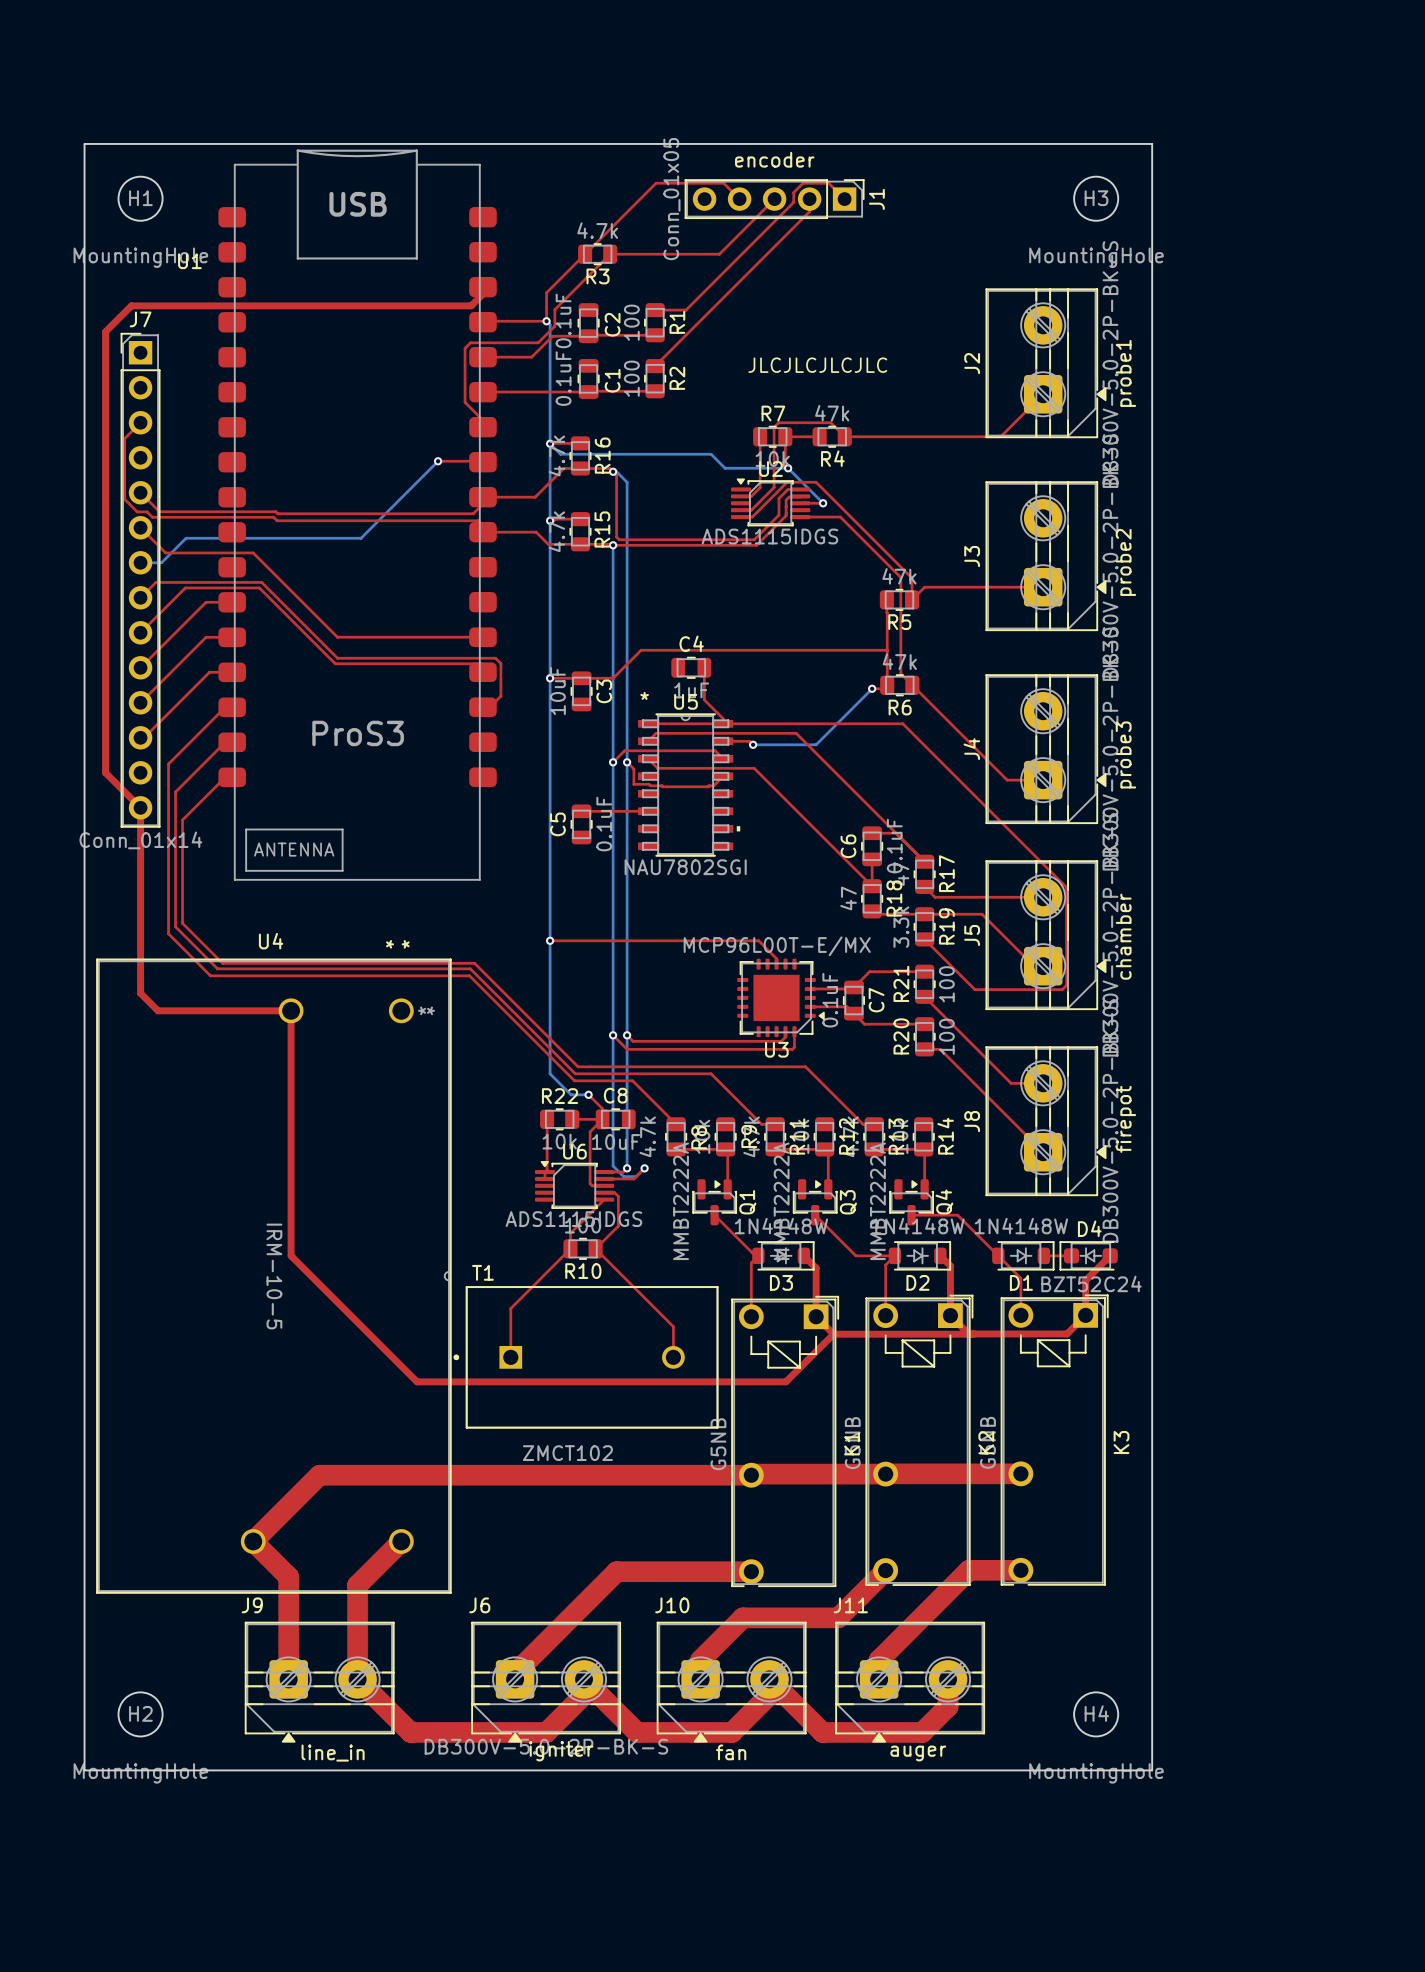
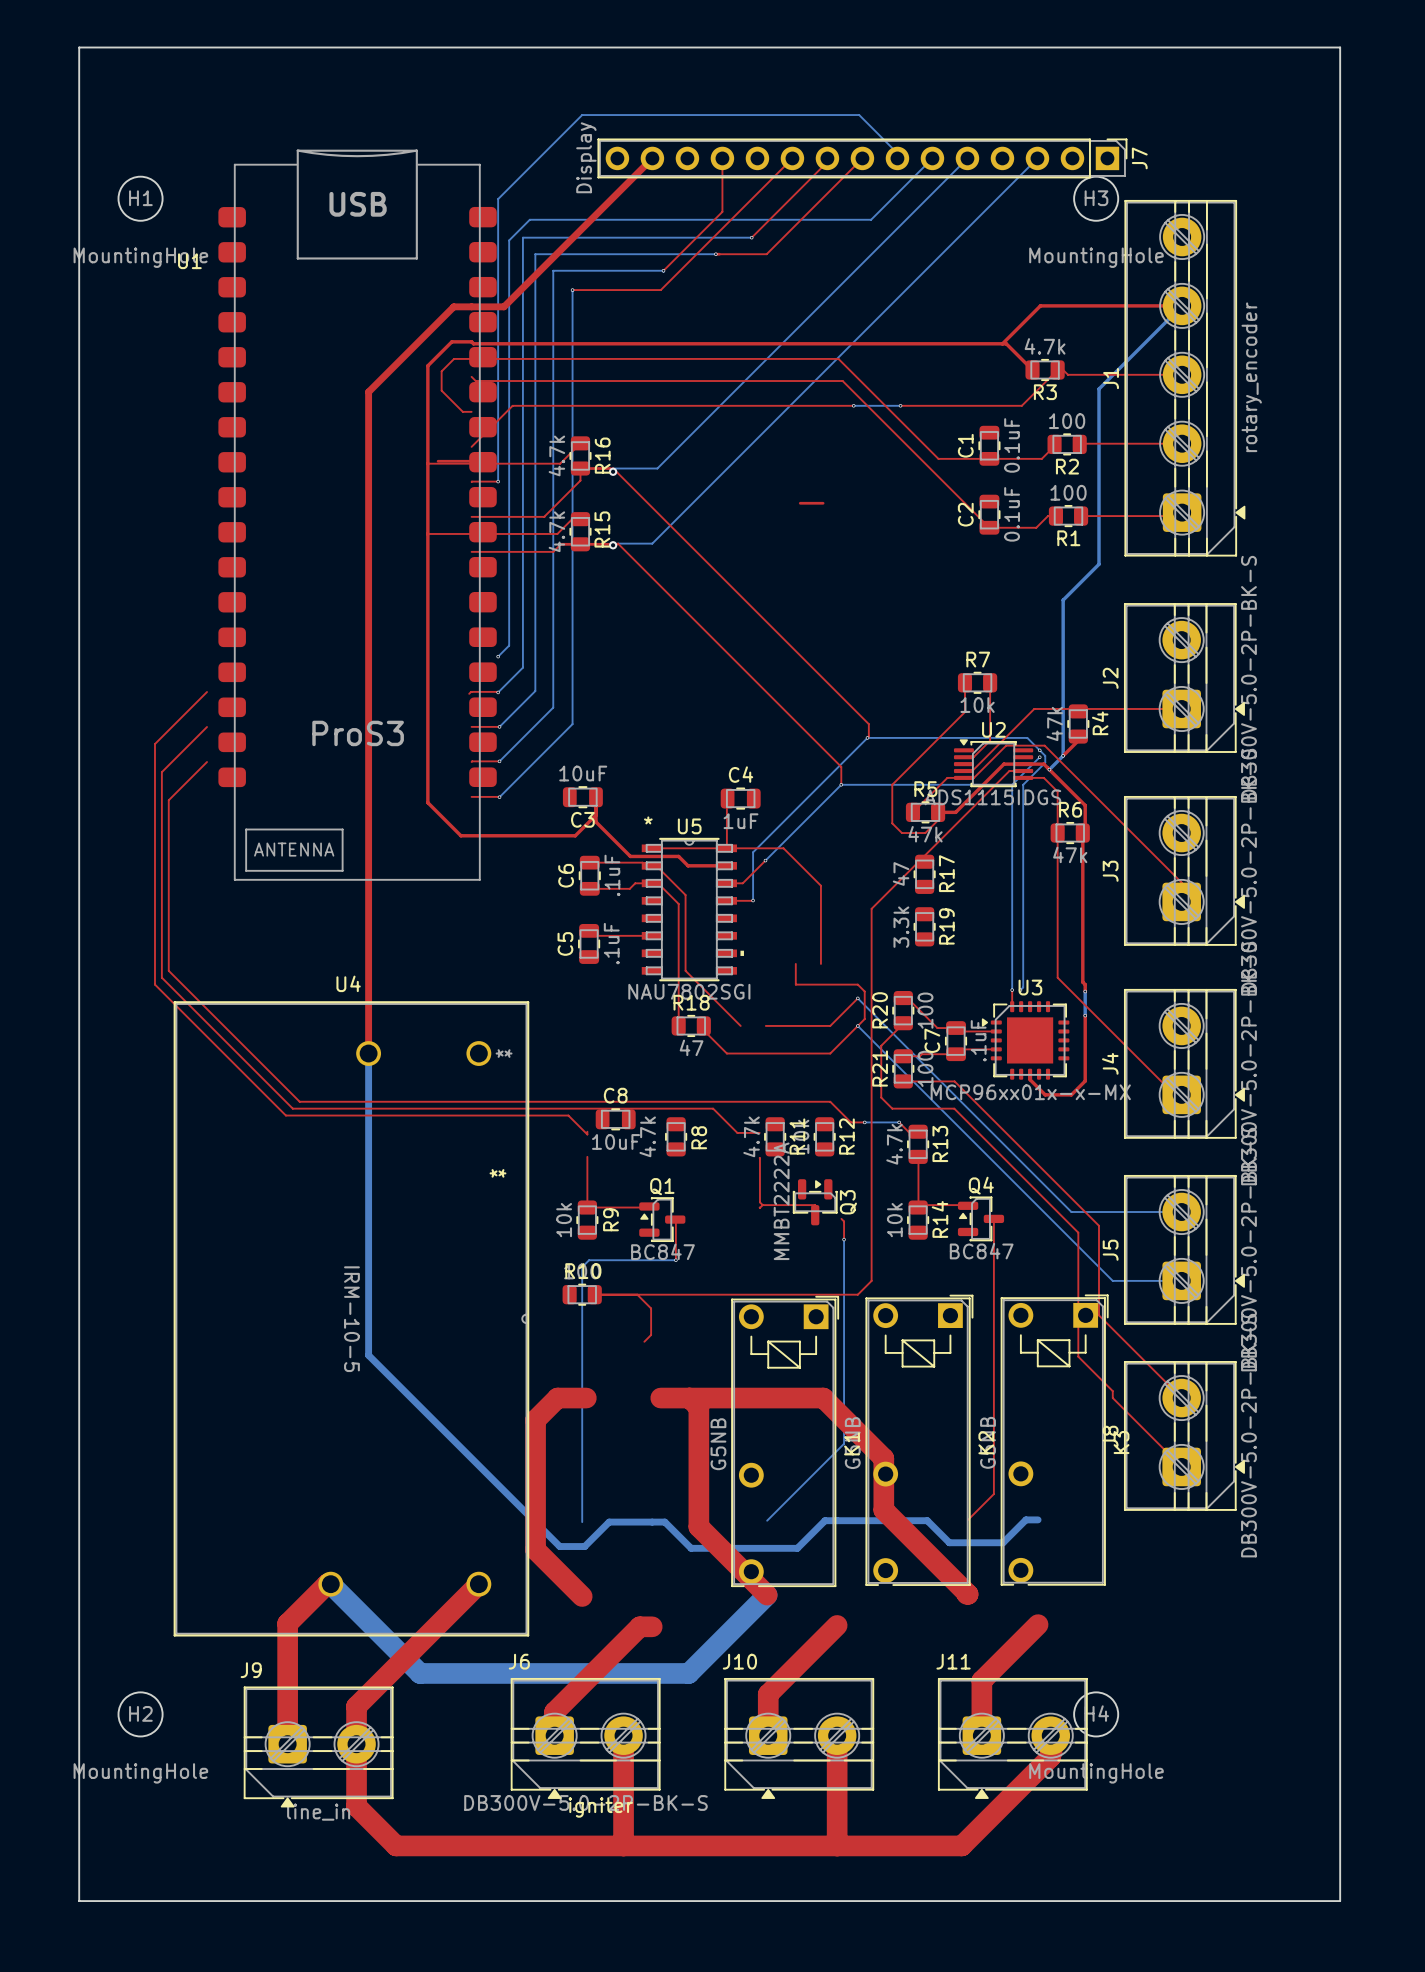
board edge: (84, 143) (1152, 143) (1152, 1770) (84, 1770) (84, 143) -> (79, 47) (79, 1901) (1340, 1901) (1340, 47) (79, 47)
top track: none -> (652, 158) (504, 306) (453, 306) (368, 392) (368, 1053)
top track: none -> (722, 158) (722, 211) (663, 270)
top track: none -> (792, 158) (660, 290) (572, 290)
top track: none -> (827, 158) (827, 161) (751, 237)
bottom track: none -> (897, 158) (897, 153) (859, 115) (582, 115) (498, 199) (498, 481)
bottom track: none -> (932, 158) (871, 219) (529, 219) (509, 240) (509, 645) (498, 656)
bottom track: none -> (967, 158) (657, 468) (613, 468)
bottom track: none -> (1037, 158) (652, 543) (618, 543)
J1 text: encoder (774, 159) -> none
J1 footprint: [684, 179, 865, 219] -> [1124, 200, 1246, 557]
J1 value: Conn_01x05 (671, 199) -> rotary_encoder (1251, 377)
top track: (739, 199) (723, 183) (656, 183) (546, 292) (546, 321) (489, 322) -> none
top track: (774, 199) (719, 254) -> (861, 160) (862, 158) (766, 254) (719, 254)
top track: (809, 199) (809, 211) (655, 366) -> none
top track: (844, 199) (828, 183) (803, 183) (793, 192) (793, 202) (686, 310) (655, 310) -> none
J1 name position: J1 (876, 199) -> J1 (1111, 378)
bottom track: none -> (751, 237) (522, 237) (522, 667) (498, 692)
via: none -> (751, 237)
R3 position: (597, 254) -> (1045, 369)
top track: (715, 254) (610, 254) (554, 309) (554, 326) (538, 342) (470, 342) (465, 348) (465, 402) (489, 427) -> none
bottom track: none -> (715, 254) (535, 254) (535, 691) (499, 726)
via: none -> (715, 254)
via: none -> (663, 270)
bottom track: none -> (663, 272) (553, 270) (553, 707) (499, 761)
top track: (489, 287) (471, 305) (131, 305) (105, 331) (105, 772) (140, 807) (140, 993) (158, 1010) (291, 1010) (291, 1255) (417, 1381) (785, 1381) (833, 1334) -> none
via: none -> (572, 290)
bottom track: none -> (573, 290) (572, 724) (499, 797)
top track: none -> (1182, 305) (1040, 305) (1002, 343)
bottom track: none -> (1182, 305) (1099, 389) (1099, 564) (1063, 600) (1063, 755) (1049, 769)
J7 name position: J7 (140, 319) -> J7 (1139, 158)
C2 value position: 0.1uF (563, 320) -> 0.1uF (1012, 514)
bottom track: (546, 321) (550, 324) (550, 1073) (571, 1094) (588, 1094) -> none
via: (546, 321) -> none
R1 rotation: 0° (655, 322) -> 90° clockwise (1068, 516)
R1 position: (655, 322) -> (1068, 516)
C2 position: (588, 323) -> (989, 514)
C2 name position: C2 (612, 324) -> C2 (965, 514)
J7 footprint: [120, 332, 161, 828] -> [597, 138, 1128, 179]
top track: (655, 335) (552, 336) (531, 357) (489, 357) -> none
J2 position: (1046, 363) -> (1184, 677)
text: JLCJLCJLCJLC (817, 365) -> none
top track: none -> (1032, 369) (1006, 343) (473, 343) (471, 341) (451, 341) (427, 365) (427, 802) (460, 835) (575, 835) (595, 815)
J2 text: probe1 (1125, 373) -> none
top track: none -> (1182, 374) (1067, 374) (1063, 369) (1057, 369) (1021, 405) (900, 405)
top track: none -> (471, 376) (475, 381) (842, 381) (989, 527) (1036, 527) (1048, 516) (1055, 516)
C1 value position: 0.1uF (563, 378) -> 0.1uF (1012, 445)
C1 position: (588, 378) -> (989, 445)
R2 rotation: 0° (655, 378) -> 90° clockwise (1067, 444)
R2 position: (655, 378) -> (1067, 444)
C1 name position: C1 (612, 380) -> C1 (965, 445)
top track: (655, 391) (490, 392) -> none
top track: (1043, 394) (1000, 436) (844, 436) (830, 422) (778, 422) (774, 427) (774, 447) -> none
top track: none -> (853, 405) (512, 405) (471, 446)
bottom track: none -> (853, 405) (900, 405)
via: none -> (853, 405)
via: none -> (900, 405)
top track: none -> (471, 411) (462, 411) (441, 390) (441, 371) (454, 358) (838, 358) (938, 458) (1041, 458) (1054, 444)
R4 value position: 47k (832, 413) -> 47k (1054, 723)
top track: (140, 422) (124, 438) (124, 499) (137, 511) (147, 511) (152, 517) (273, 517) (277, 520) (478, 520) (489, 532) (536, 532) (548, 544) (560, 544) -> (471, 551) (553, 551) (560, 544)
top track: (760, 436) (760, 487) (751, 496) (740, 496) -> none
R7 position: (772, 436) -> (977, 682)
top track: (819, 436) (785, 436) (785, 465) (788, 468) -> none
R4 rotation: 0° (832, 436) -> 90° clockwise (1078, 723)
R4 position: (832, 436) -> (1078, 723)
bottom track: (550, 443) (560, 454) (711, 454) (725, 468) (788, 468) (823, 503) -> none
via: (550, 443) -> none
top track: (580, 443) (550, 443) -> (580, 443) (560, 463) (427, 463)
top track: none -> (1079, 443) (1182, 443)
top track: (774, 447) (774, 487) (751, 510) (740, 510) -> none
R4 name position: R4 (832, 458) -> R4 (1100, 723)
bottom track: (438, 461) (361, 538) (186, 538) (161, 562) (140, 562) -> none
via: (438, 461) -> none
top track: (580, 468) (563, 468) (535, 497) (489, 497) (473, 513) (159, 511) (140, 492) -> (580, 468) (580, 480) (544, 516)
top track: (609, 468) (616, 475) (616, 537) (619, 539) (754, 539) (778, 515) (778, 498) (787, 489) (800, 489) -> (609, 468) (613, 468) (868, 724) (867, 737)
via: (788, 468) -> none
bottom track: (613, 471) (616, 471) (627, 482) (627, 1168) -> none
top track: none -> (498, 481) (471, 481)
via: none -> (498, 481)
top track: (800, 496) (789, 497) (786, 500) (786, 515) (756, 545) (612, 544) -> (841, 784) (841, 766) (618, 543) (612, 544)
U2 position: (770, 502) -> (993, 763)
via: (823, 503) -> none
top track: none -> (1182, 512) (1178, 516) (1081, 516)
top track: none -> (471, 516) (544, 516)
top track: (740, 517) (752, 517) (787, 482) (816, 482) (912, 578) (912, 599) (924, 587) (1043, 587) -> none
top track: (800, 517) (840, 517) (900, 577) (900, 673) (1007, 780) (1043, 780) -> none
top track: (572, 519) (550, 520) -> (572, 519) (557, 533) (427, 533)
via: (550, 520) -> none
top track: (140, 527) (165, 552) (253, 552) (337, 637) (489, 637) -> none
bottom track: (613, 545) (613, 1166) (623, 1176) (636, 1176) (644, 1168) -> none
J3 position: (1046, 556) -> (1184, 870)
J3 text: probe2 (1125, 562) -> none
R5 value position: 47k (899, 576) -> 47k (925, 834)
top track: (140, 597) (155, 582) (261, 582) (337, 658) (495, 658) (500, 663) (500, 696) (489, 707) -> none
top track: (886, 599) (887, 685) (883, 688) (872, 688) -> none
R5 position: (899, 599) -> (925, 812)
top track: (225, 602) (206, 602) (140, 667) -> none
R5 name position: R5 (899, 622) -> R5 (925, 789)
top track: (140, 632) (185, 587) (259, 587) (335, 663) (481, 663) (489, 672) -> none
top track: (225, 637) (206, 637) (140, 702) -> none
top track: (887, 650) (641, 650) (613, 678) (550, 678) -> none
via: none -> (498, 656)
R6 value position: 47k (899, 661) -> 47k (1070, 854)
C4 position: (691, 667) -> (740, 798)
top track: (704, 667) (704, 699) (723, 718) (723, 723) -> none
top track: (225, 672) (209, 672) (140, 741) (140, 737) -> none
via: (550, 678) -> none
top track: none -> (962, 682) (964, 682) (964, 712) (892, 784) (892, 823) (901, 833) (925, 833) (938, 820) (938, 812) (955, 812) (1003, 764) (1043, 764) (1085, 805) (1085, 833) (1082, 833) (1082, 982) (1085, 984) (1085, 991)
top track: none -> (990, 682) (990, 740) (973, 757) (963, 757)
R6 position: (899, 685) -> (1070, 833)
bottom track: (872, 688) (816, 744) (753, 744) -> none
via: (872, 688) -> none
top track: none -> (207, 691) (154, 744) (154, 984) (285, 1115) (568, 1115) (587, 1134) (587, 1131)
C3 rotation: 0° (581, 691) -> 90° clockwise (582, 797)
C3 position: (581, 691) -> (582, 797)
top track: none -> (498, 692) (471, 691) (469, 693)
via: none -> (498, 692)
top track: (225, 707) (168, 764) (168, 933) (210, 975) (469, 975) (574, 1080) (632, 1080) (676, 1124) -> none
R6 name position: R6 (900, 707) -> R6 (1070, 809)
top track: none -> (1181, 708) (1034, 708) (972, 771) (963, 771)
top track: (648, 723) (902, 723) (1066, 887) (1066, 985) (1062, 989) (974, 989) (924, 939) -> none
top track: none -> (471, 726) (499, 726)
via: none -> (499, 726)
top track: none -> (207, 727) (161, 772) (161, 977) (292, 1108) (713, 1108) (737, 1132) (759, 1132)
top track: none -> (1078, 736) (1078, 740) (1064, 754)
via: none -> (867, 737)
top track: (648, 741) (656, 733) (796, 733) (924, 861) -> none
top track: (723, 741) (749, 741) (753, 744) -> none
top track: (225, 742) (175, 792) (175, 926) (217, 968) (470, 968) (575, 1073) (711, 1073) (761, 1124) (775, 1124) -> none
via: (753, 744) -> none
J4 position: (1046, 749) -> (1184, 1063)
via: none -> (1039, 750)
J4 text: probe3 (1125, 754) -> none
via: none -> (1063, 755)
bottom track: none -> (1039, 757) (1012, 784)
via: none -> (1039, 757)
top track: (648, 758) (657, 768) (754, 768) (872, 886) (872, 859) -> none
top track: (723, 758) (715, 750) (624, 750) (613, 762) -> none
top track: none -> (499, 761) (471, 761)
via: none -> (499, 761)
top track: none -> (207, 762) (168, 800) (168, 970) (299, 1101) (830, 1101) (850, 1122) (864, 1122)
via: (613, 762) -> none
top track: (627, 762) (633, 769) (633, 784) (662, 786) (708, 786) (713, 785) (723, 776) -> none
via: (627, 762) -> none
via: none -> (1049, 769)
top track: none -> (1023, 771) (1009, 771) (871, 908) (871, 1280) (857, 1294) (594, 1294)
top track: (225, 777) (182, 820) (182, 923) (222, 963) (474, 963) (578, 1066) (805, 1066) (863, 1124) (874, 1124) -> none
top track: none -> (1023, 777) (1043, 777) (1057, 791) (1057, 977) (1181, 1101) (1181, 1094)
via: none -> (841, 784)
bottom track: none -> (1012, 784) (1012, 990)
bottom track: none -> (1012, 784) (841, 784) (765, 860)
U5 position: (689, 785) -> (692, 909)
top track: none -> (471, 796) (499, 797)
via: none -> (499, 797)
top track: none -> (595, 797) (595, 822) (630, 856) (678, 856) (688, 865) (726, 865)
top track: none -> (727, 798) (726, 848)
top track: (581, 811) (648, 811) -> none
top track: none -> (912, 812) (947, 777) (973, 777) (1006, 745) (1044, 745) (1181, 882) (1181, 901)
C5 position: (581, 824) -> (589, 943)
C5 value: 0.1uF (604, 824) -> .1uF (611, 943)
top track: (872, 833) (896, 833) -> none
J7 value: Conn_01x14 (140, 840) -> Display (586, 157)
C6 value: 0.1uF (894, 845) -> .1uF (612, 875)
C6 position: (872, 846) -> (589, 875)
top track: none -> (651, 848) (783, 848) (820, 885) (820, 963)
top track: none -> (765, 860) (742, 883) (726, 883)
via: none -> (765, 860)
top track: none -> (589, 862) (642, 862) (645, 865) (656, 865) (685, 895) (685, 970) (740, 1025)
top track: (924, 886) (935, 897) (1043, 897) -> none
top track: none -> (589, 888) (629, 888) (635, 883) (658, 883) (678, 903) (678, 1025)
R18 value position: 47 (848, 898) -> 47 (691, 1047)
R18 rotation: 0° (872, 898) -> 90° clockwise (691, 1025)
R18 position: (872, 898) -> (691, 1025)
R18 name position: R18 (894, 898) -> R18 (691, 1002)
top track: none -> (753, 900) (726, 900)
bottom track: none -> (753, 900) (753, 852) (867, 737) (1027, 737) (1045, 755) (1045, 762) (1023, 784) (1023, 987) (1020, 990)
via: none -> (753, 900)
top track: (872, 911) (874, 914) (982, 914) (1034, 966) (1043, 966) -> none
top track: none -> (589, 930) (594, 935) (651, 935)
J5 position: (1046, 935) -> (1184, 1249)
J5 text: chamber (1123, 936) -> none
top track: (550, 940) (758, 940) (776, 958) (776, 964) -> none
via: (550, 940) -> none
U3 value: MCP96L00T-E/MX (777, 946) -> MCP96xx01x-x-MX (1030, 1092)
U4 footprint: [96, 958, 452, 1594] -> [173, 1001, 530, 1637]
top track: none -> (795, 963) (795, 984) (857, 984) (864, 991) (864, 1019) (830, 1053) (726, 1053) (703, 1030) (703, 1025)
top track: (924, 971) (869, 971) (853, 987) (810, 988) -> none
R21 position: (924, 984) -> (903, 1068)
top track: none -> (1012, 990) (1012, 1006)
via: none -> (1012, 990)
via: none -> (1020, 990)
bottom track: none -> (1085, 991) (1085, 1015)
via: none -> (1085, 991)
top track: (924, 996) (1011, 1083) (1043, 1083) -> none
U3 rotation: 0° (781, 997) -> 180° (1025, 1040)
U3 position: (781, 997) -> (1025, 1040)
top track: none -> (857, 998) (830, 1025) (765, 1025)
bottom track: none -> (857, 998) (1071, 1212) (1181, 1212)
via: none -> (857, 998)
top track: none -> (903, 998) (907, 998) (937, 1028) (956, 1028) (959, 1031) (996, 1031)
C7 value: 0.1uF (830, 1000) -> .1uF (978, 1040)
C7 position: (853, 1000) -> (956, 1041)
C7 name position: C7 (876, 1000) -> C7 (932, 1040)
top track: (810, 1006) (847, 1006) (864, 1024) (924, 1024) -> none
top track: none -> (1085, 1015) (1085, 1081) (1071, 1094) (1045, 1094) (1030, 1079) (1030, 1074)
via: none -> (1085, 1015)
bottom track: none -> (857, 1025) (1112, 1280) (1181, 1280)
via: none -> (857, 1025)
top track: none -> (899, 1027) (881, 1045) (881, 1097) (892, 1108) (954, 1108) (1078, 1232) (1078, 1356) (1112, 1391) (1112, 1398) (1181, 1466)
top track: (785, 1031) (785, 1037) (781, 1041) (633, 1041) (627, 1035) -> none
top track: (794, 1031) (794, 1047) (792, 1049) (627, 1049) (613, 1035) -> none
via: (613, 1035) -> none
via: (627, 1035) -> none
R20 position: (924, 1036) -> (903, 1010)
top track: (924, 1049) (940, 1049) (1043, 1152) -> none
top track: none -> (996, 1049) (960, 1049) (956, 1054) (903, 1056)
bottom track: none -> (368, 1053) (368, 1355) (559, 1546) (584, 1546) (609, 1522) (664, 1522) (691, 1548) (797, 1548) (825, 1520) (927, 1520) (949, 1542) (1003, 1542) (1025, 1519) (1038, 1519)
top track: none -> (903, 1081) (954, 1081) (1099, 1225) (1099, 1315) (1181, 1398)
top track: (588, 1094) (602, 1108) (602, 1119) -> none
via: (588, 1094) -> none
top track: (547, 1119) (547, 1169) (544, 1172) (544, 1178) -> none
R22: 10k (559, 1119) -> none
top track: (572, 1119) (602, 1119) -> none
top track: (602, 1119) (590, 1131) (590, 1183) (592, 1185) (604, 1185) -> none
J8 text: firepot (1125, 1119) -> none
J8 position: (1046, 1121) -> (1184, 1435)
bottom track: none -> (864, 1122) (899, 1122)
via: none -> (864, 1122)
top track: none -> (899, 1122) (908, 1131) (918, 1131)
via: none -> (899, 1122)
R9 position: (725, 1136) -> (587, 1220)
R13 position: (874, 1136) -> (918, 1144)
R14 position: (923, 1136) -> (918, 1220)
top track: (676, 1149) (725, 1149) (727, 1151) (727, 1189) -> none
top track: (775, 1149) (824, 1149) (828, 1153) (828, 1189) -> none
top track: (874, 1149) (923, 1149) (924, 1189) -> none
top track: none -> (587, 1156) (587, 1207) (649, 1206)
top track: none -> (918, 1156) (918, 1202) (921, 1205)
top track: none -> (759, 1158) (759, 1202) (762, 1205)
top track: (627, 1168) (623, 1172) (604, 1172) -> none
via: (627, 1168) -> none
top track: (644, 1168) (633, 1178) (604, 1178) -> none
via: (644, 1168) -> none
U6: ADS1115IDGS (574, 1184) -> none
top track: (604, 1192) (614, 1192) (618, 1196) (618, 1226) (595, 1248) (673, 1326) (673, 1357) -> none
top track: (604, 1199) (570, 1233) (570, 1248) (510, 1308) (510, 1357) -> none
Q1 value: MMBT2222A (681, 1201) -> BC847 (662, 1251)
Q4 value: MMBT2222A (877, 1201) -> BC847 (981, 1251)
Q1 rotation: 0° (714, 1202) -> 90° counterclockwise (662, 1219)
Q1 position: (714, 1202) -> (662, 1219)
Q4 rotation: 0° (911, 1202) -> 90° counterclockwise (981, 1218)
Q4 position: (911, 1202) -> (981, 1218)
top track: none -> (762, 1205) (815, 1205)
top track: none -> (762, 1205) (759, 1207)
top track: none -> (921, 1205) (968, 1205)
top track: (714, 1215) (755, 1255) (758, 1255) (751, 1262) (751, 1316) -> none
top track: (815, 1215) (855, 1255) (894, 1255) (885, 1265) (885, 1315) -> none
top track: (911, 1215) (957, 1215) (1020, 1278) (1020, 1315) -> none
top track: none -> (841, 1218) (844, 1221) (844, 1239)
top track: none -> (993, 1218) (993, 1494) (968, 1519)
top track: none -> (675, 1219) (675, 1260)
bottom track: none -> (844, 1239) (844, 1443) (767, 1520)
via: none -> (844, 1239)
R10 position: (583, 1248) -> (582, 1294)
D3: 1N4148W (783, 1255) -> none
top track: (803, 1255) (816, 1268) (816, 1316) (833, 1334) -> none
D2: 1N4148W (919, 1255) -> none
top track: (940, 1255) (950, 1265) (950, 1315) (968, 1333) (1067, 1333) (1085, 1315) (1085, 1280) (1110, 1255) -> none
D1: 1N4148W (1023, 1255) -> none
top track: (1043, 1255) (1071, 1255) -> none
D4: BZT52C24 (1088, 1255) -> none
bottom track: none -> (675, 1260) (589, 1260) (582, 1267) (582, 1522)
via: none -> (675, 1260)
top track: none -> (637, 1294) (651, 1308) (651, 1335) (644, 1341)
top track: (973, 1333) (833, 1334) -> none
T1: ZMCT102 (585, 1357) -> none
top track: none -> (586, 1398) (557, 1398) (535, 1420) (535, 1549) (582, 1596)
top track: none -> (660, 1398) (823, 1398) (883, 1458) (883, 1510) (966, 1594)
top track: none -> (689, 1398) (698, 1407) (698, 1526) (767, 1595)
top track: (1020, 1473) (319, 1475) (253, 1541) (288, 1576) (288, 1679) -> none
top track: (401, 1541) (357, 1585) (357, 1679) (410, 1732) (546, 1732) (584, 1694) (584, 1679) (637, 1732) (731, 1732) (769, 1694) (769, 1679) (822, 1732) (922, 1732) (948, 1706) (948, 1679) -> none
top track: (885, 1570) (838, 1617) (742, 1617) (700, 1660) (700, 1679) -> none
top track: (1020, 1570) (968, 1570) (879, 1660) (879, 1679) -> none
top track: (751, 1571) (616, 1571) (515, 1673) (515, 1679) -> none
top track: none -> (327, 1584) (287, 1623) (287, 1744)
bottom track: none -> (330, 1584) (420, 1673) (688, 1673) (767, 1595)
top track: none -> (478, 1584) (356, 1706) (356, 1806) (396, 1845) (961, 1845) (1050, 1757) (1050, 1735)
top track: none -> (1038, 1624) (981, 1680) (981, 1735)
top track: none -> (837, 1625) (768, 1694) (768, 1735)
top track: none -> (652, 1626) (639, 1626) (554, 1712) (554, 1735)
J9 position: (319, 1682) -> (318, 1747)
J6 position: (546, 1682) -> (585, 1738)
J10 position: (731, 1682) -> (799, 1738)
J11 position: (910, 1682) -> (1012, 1738)
top track: none -> (623, 1735) (623, 1845)
top track: none -> (837, 1735) (837, 1845)
J10 text: fan (731, 1752) -> none
J9 text: line_in (333, 1753) -> none
J11 text: auger (918, 1753) -> none
J9 value: none -> line_in (318, 1812)

